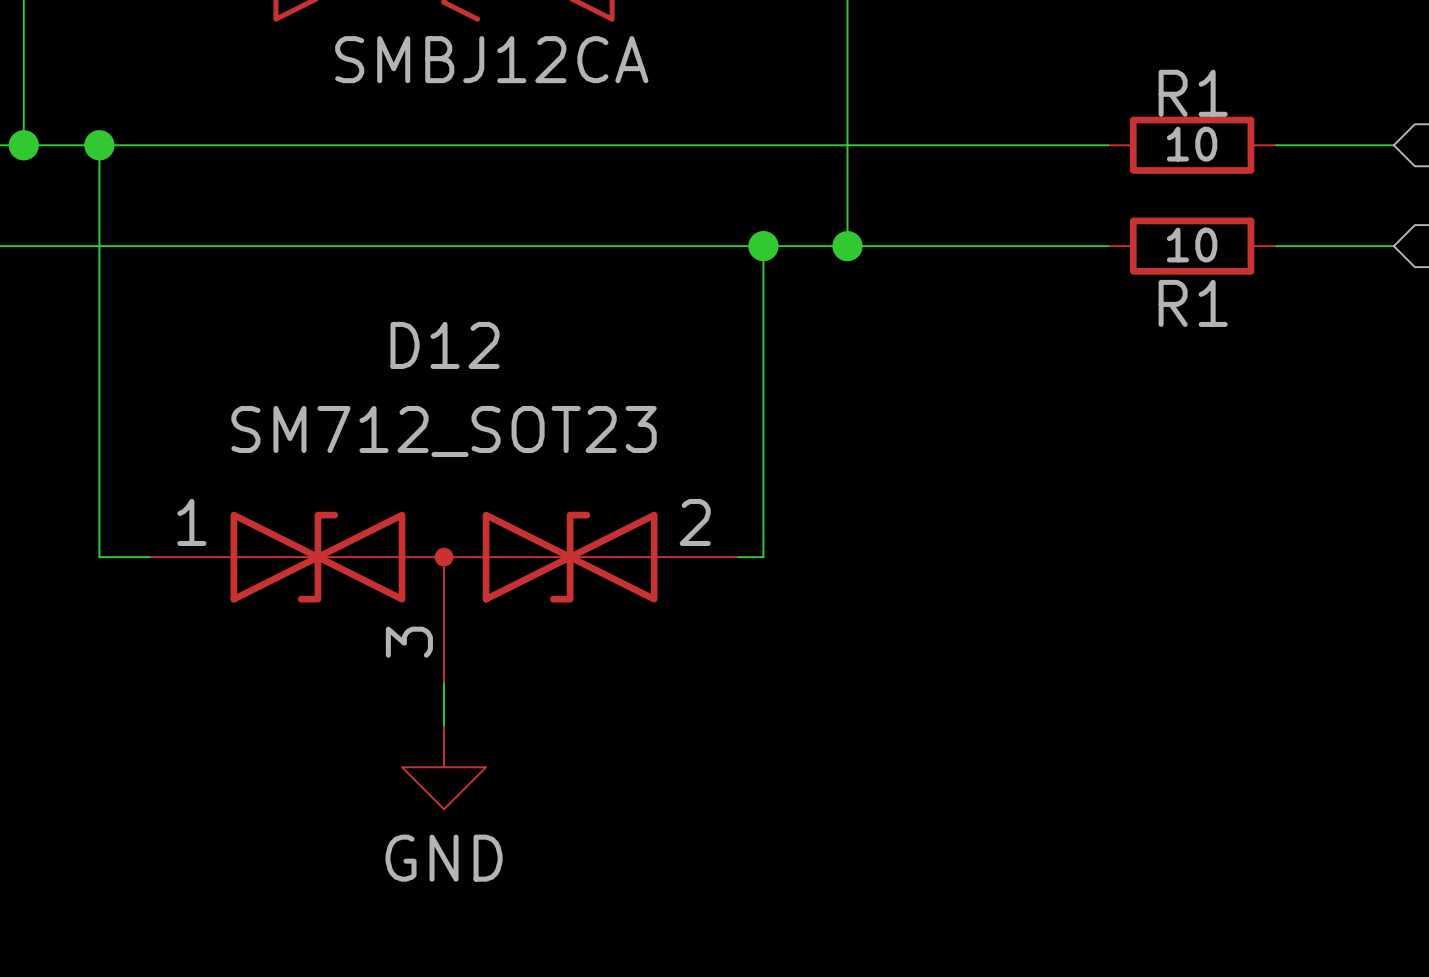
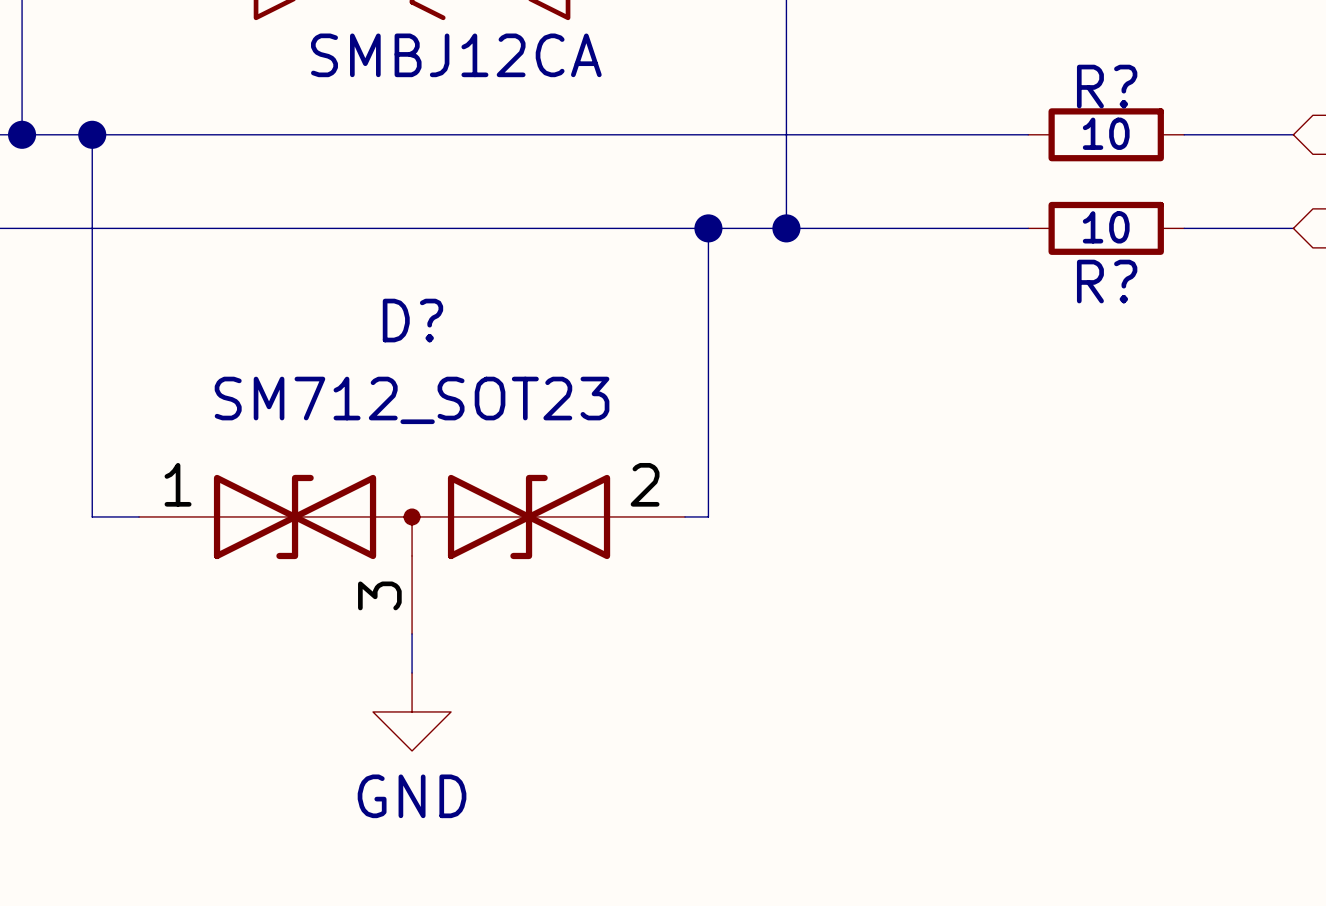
R1 name: R1 (1193, 93) -> R? (1107, 86)
R1 name: R1 (1193, 303) -> R? (1107, 281)
D12 name: D12 (445, 345) -> D? (412, 320)

